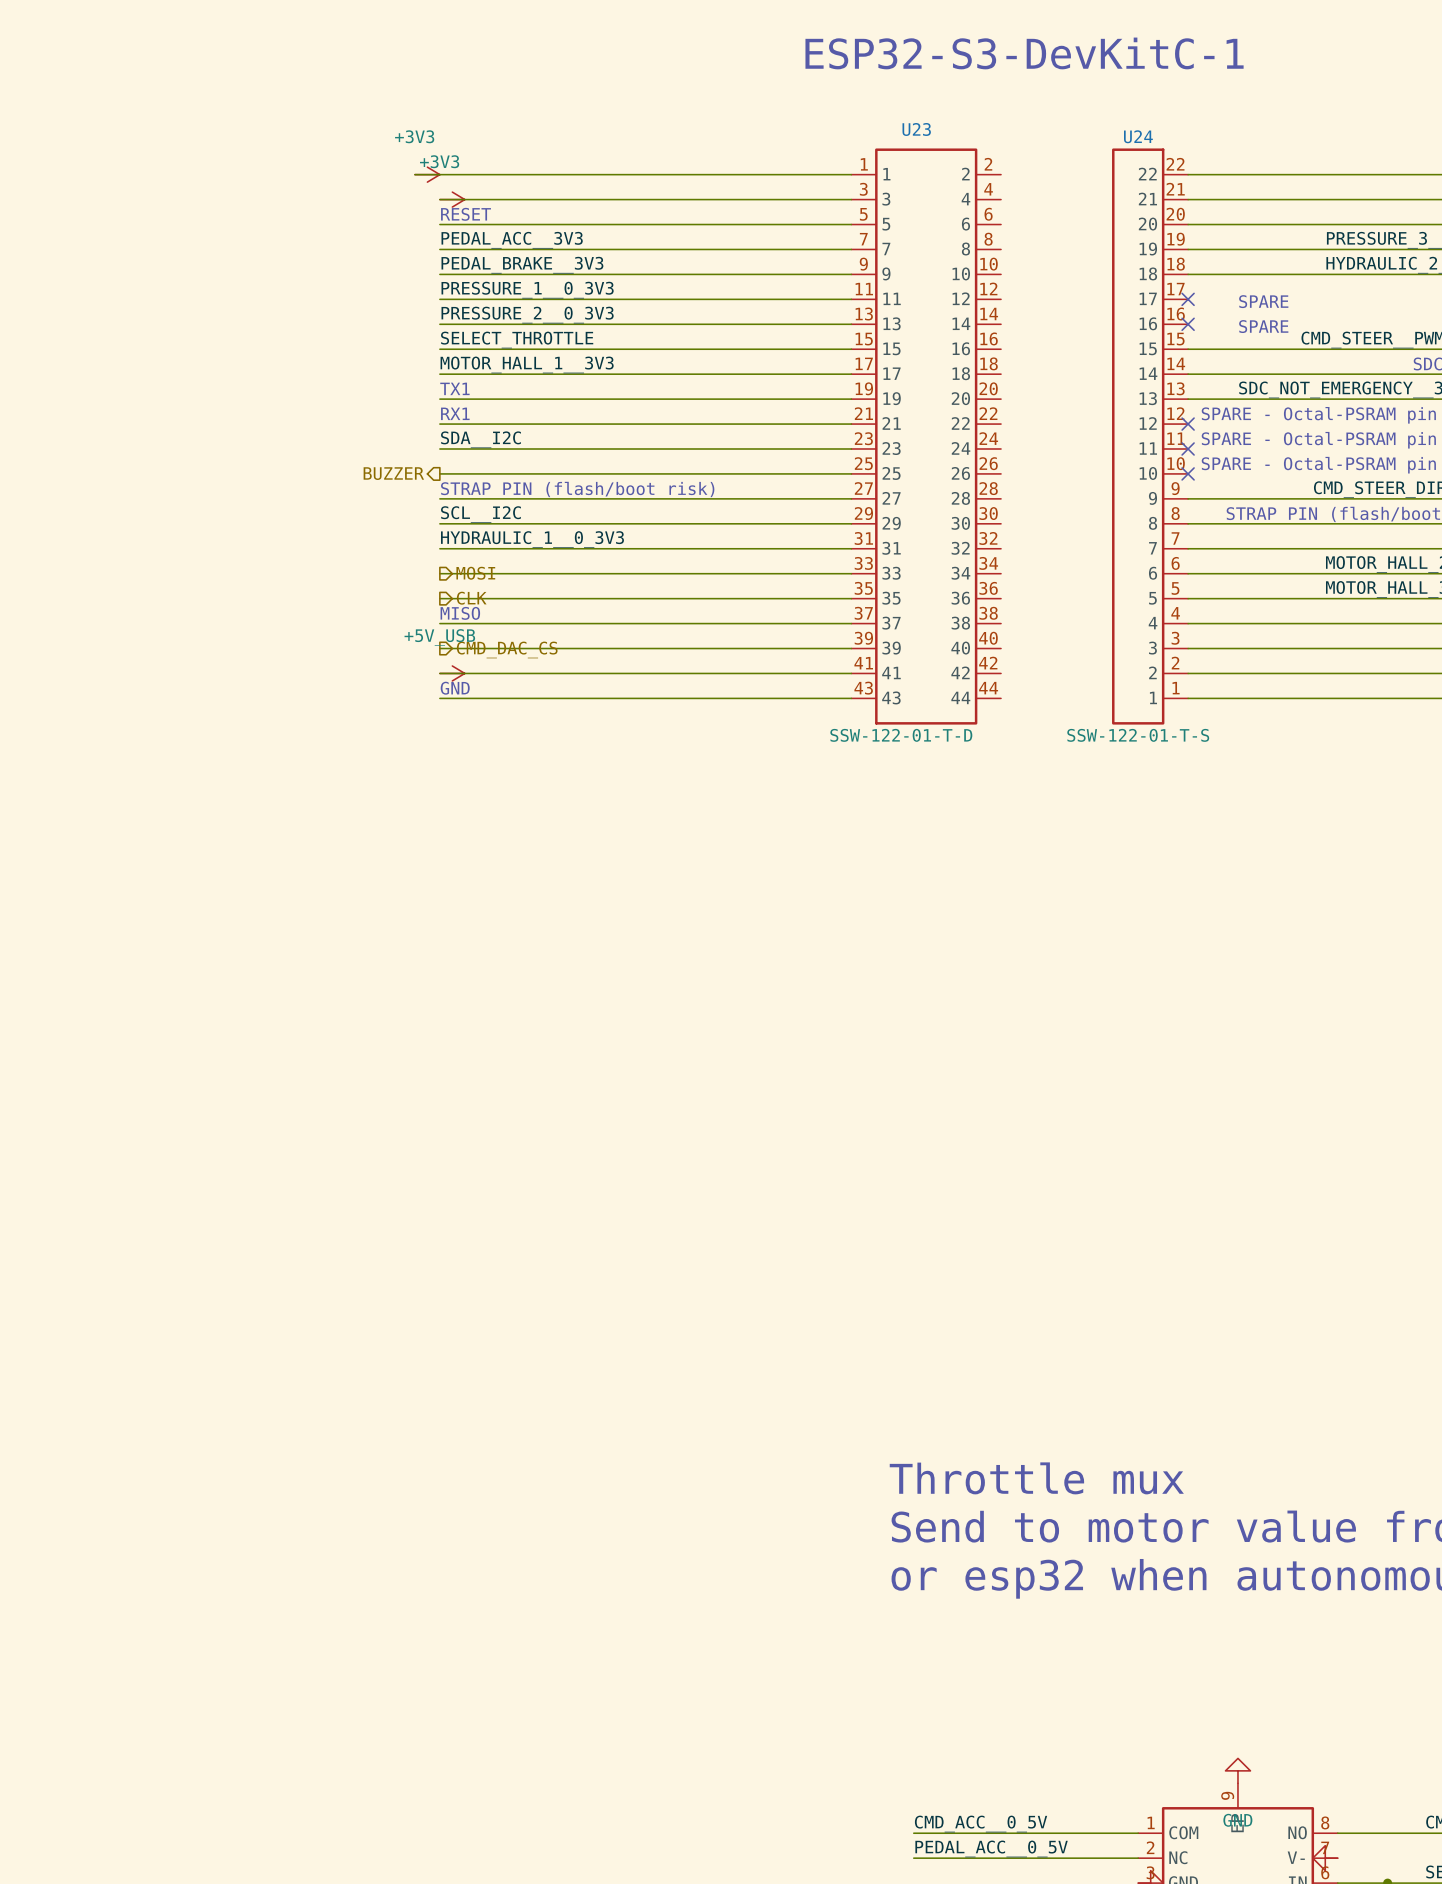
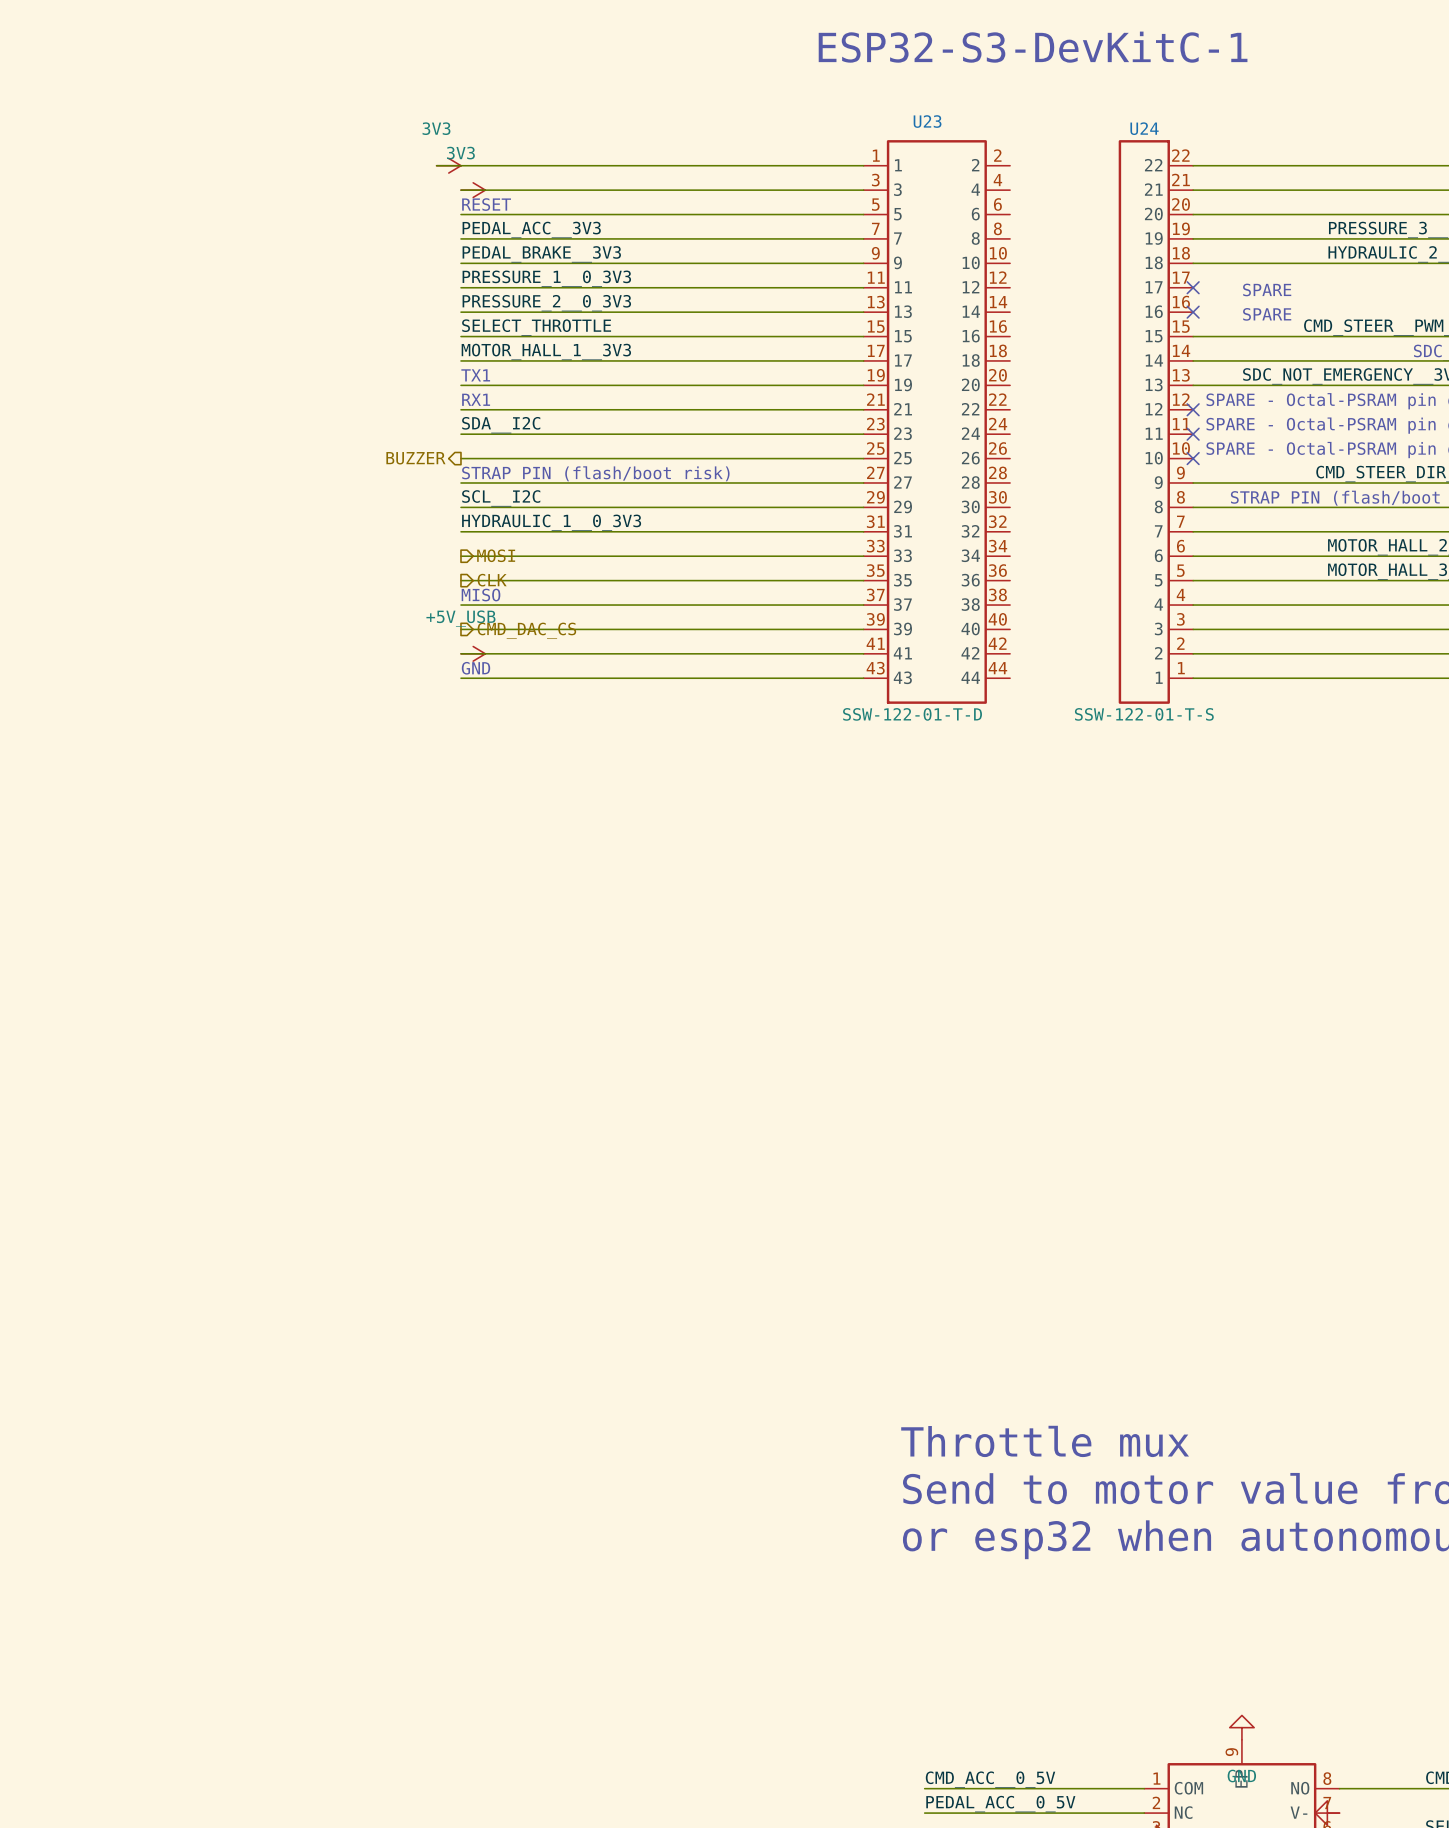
power symbol: +3V3 (427, 174) -> 3V3 (448, 165)
power symbol: +3V3 (452, 199) -> 3V3 (473, 190)

